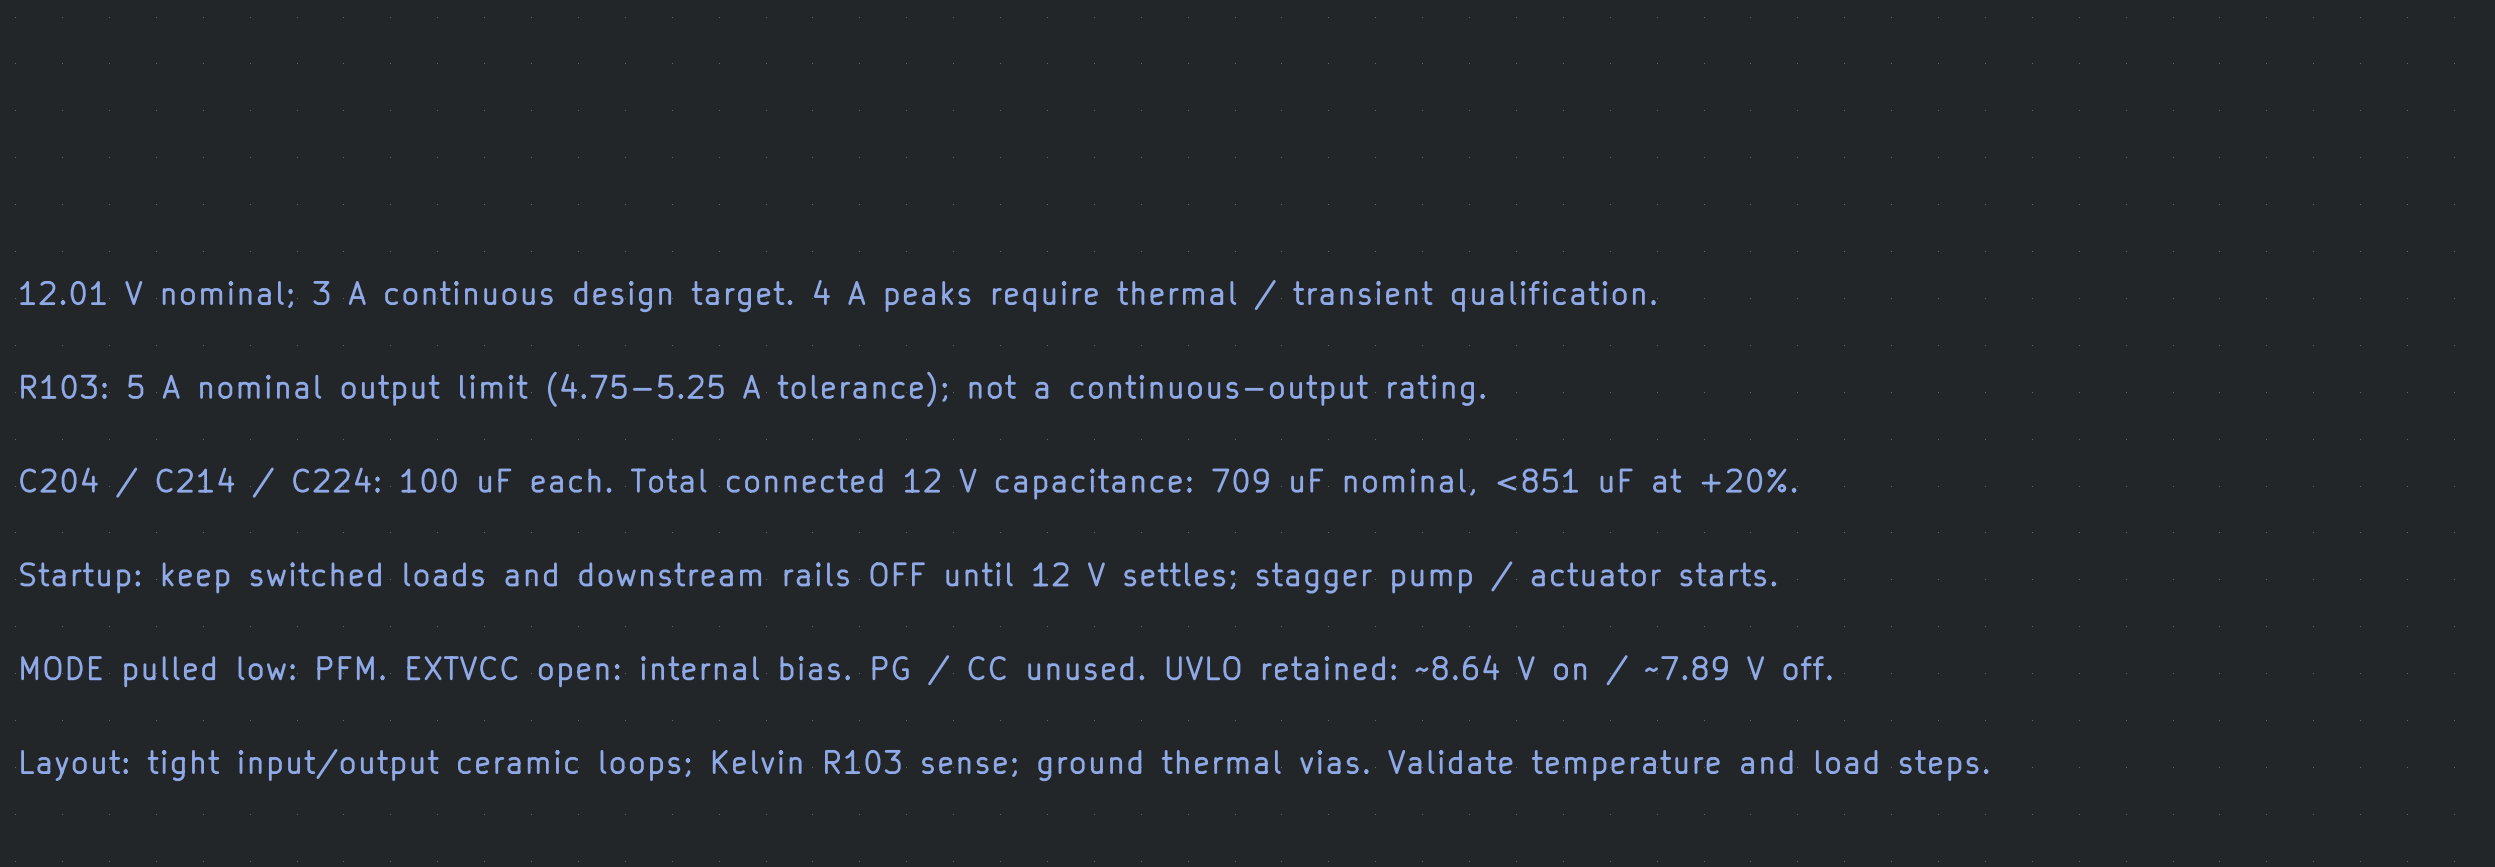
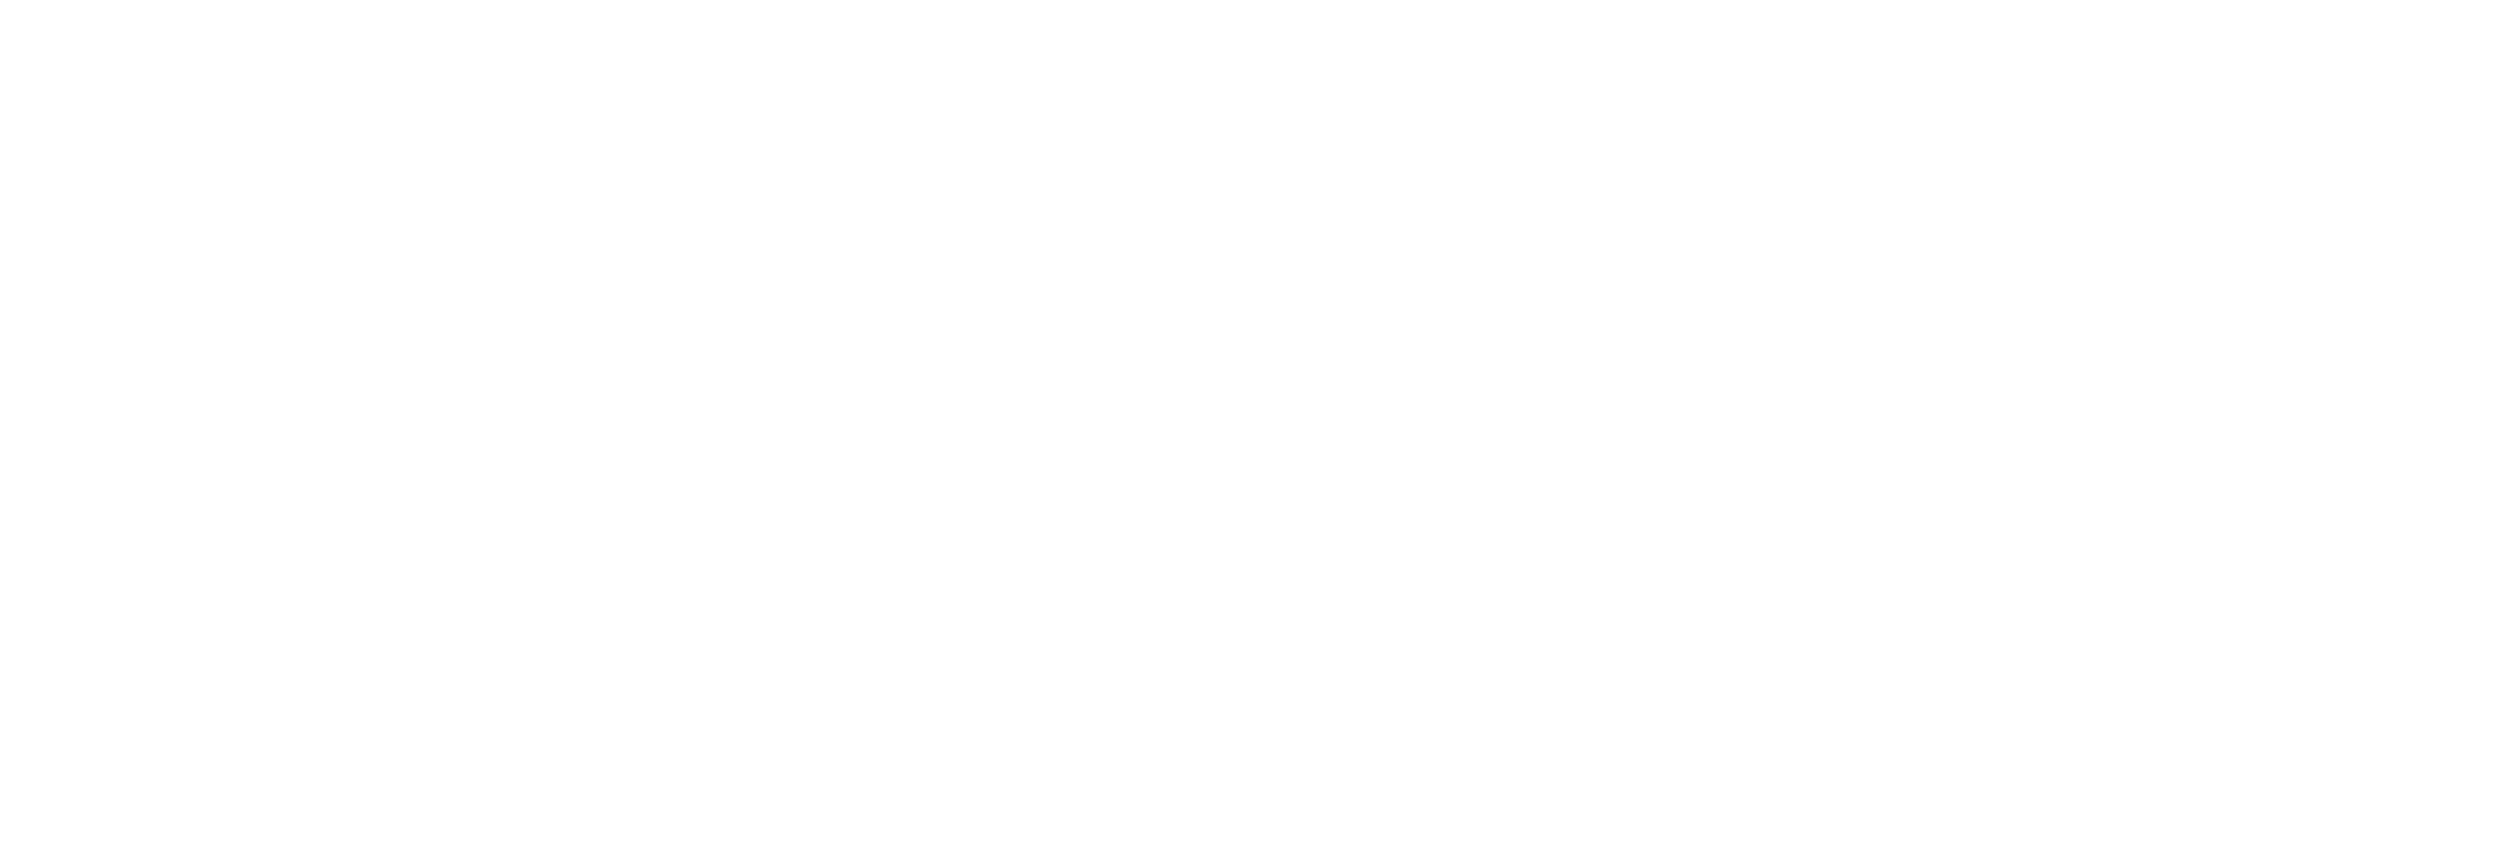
text: 12.01 V nominal; 3 A continuous design target. 4 A peaks require thermal / transient qualification. (838, 296) -> none
text: R103: 5 A nominal output limit (4.75-5.25 A tolerance); not a continuous-output rating. (753, 389) -> none
text: C204 / C214 / C224: 100 uF each. Total connected 12 V capacitance: 709 uF nominal, <851 uF at +20%. (908, 483) -> none
text: Startup: keep switched loads and downstream rails OFF until 12 V settles; stagger pump / actuator starts. (898, 577) -> none
text: MODE pulled low: PFM. EXTVCC open: internal bias. PG / CC unused. UVLO retained: ~8.64 V on / ~7.89 V off. (926, 671) -> none
text: Layout: tight input/output ceramic loops; Kelvin R103 sense; ground thermal vias. Validate temperature and load steps. (1004, 765) -> none

